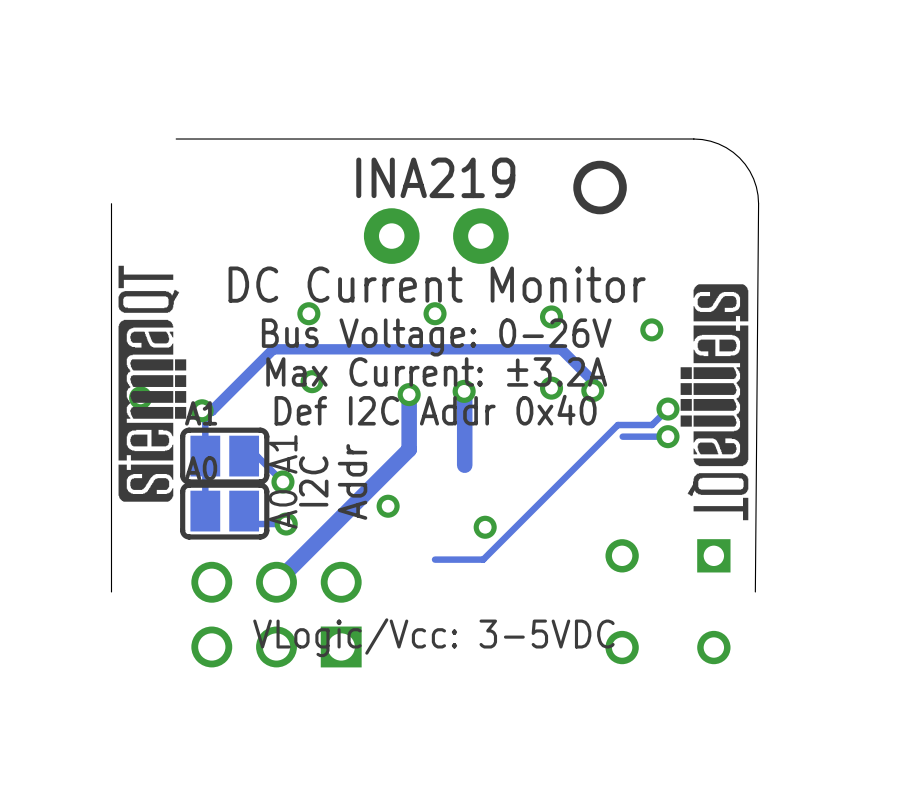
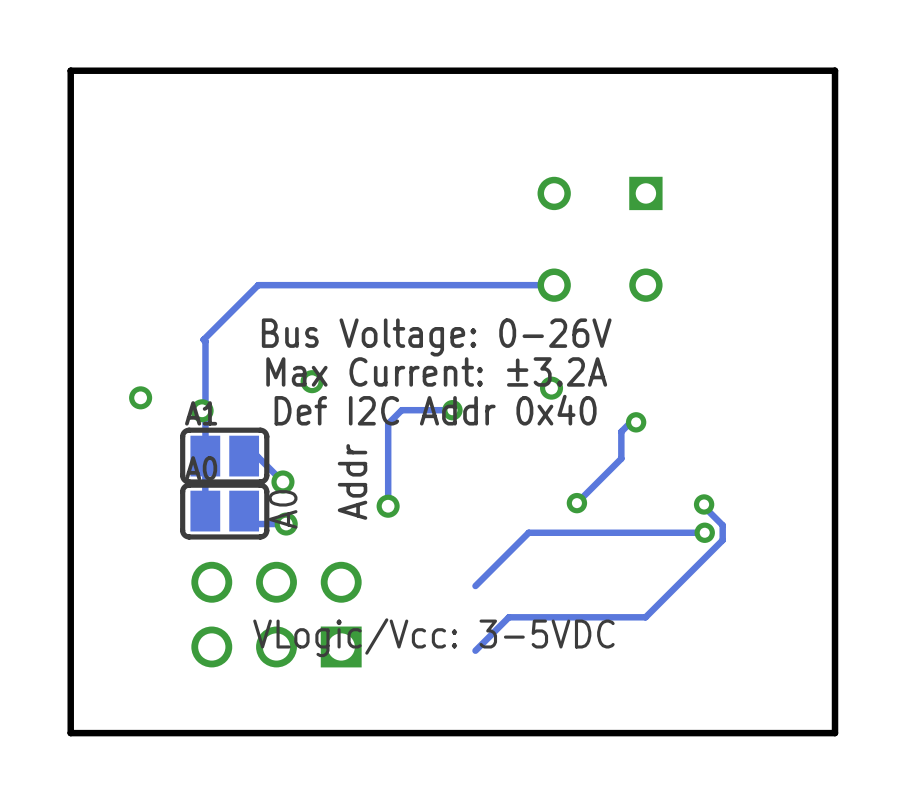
board edge: none -> (835, 70) (70, 70) (70, 733) (835, 733) (835, 70)
board edge: (176, 139) (693, 139) (710, 141) (733, 152) (745, 164) (753, 178) (758, 203) (755, 591) -> none
drawing: [573, 160, 627, 215] -> none
text: INA219 (435, 177) -> none
board edge: (111, 203) (111, 591) -> none
part: (436, 236) -> none
drawing: [118, 265, 187, 502] -> none
text: DC Current Monitor (437, 284) -> none
drawing: [680, 284, 749, 521] -> none
via: (308, 313) -> none
via: (435, 313) -> none
via: (551, 316) -> none
via: (651, 329) -> none
track: (592, 390) (592, 380) (561, 349) (273, 349) (211, 410) (202, 410) (205, 414) (205, 456) -> (554, 285) (258, 285) (203, 339) (205, 341) (205, 455)
via: (592, 390) -> none
track: (464, 391) (464, 465) -> none
via position: (464, 391) -> (452, 410)
track: (409, 394) (409, 449) (273, 585) -> none
via: (409, 394) -> none
track: (667, 409) (652, 425) (617, 425) (483, 559) (435, 559) -> none
via: (667, 409) -> none
track: none -> (452, 410) (401, 410) (388, 423) (388, 506)
track: none -> (636, 422) (630, 422) (621, 431) (621, 458) (576, 503)
via: none -> (636, 422)
track: (667, 436) (622, 436) -> none
via: (667, 436) -> none
text: A1 (282, 454) -> none
text: I2C (313, 481) -> none
via: none -> (576, 503)
track: none -> (704, 504) (722, 525) (722, 540) (645, 617) (508, 617) (475, 650)
via: none -> (704, 504)
via: (485, 527) -> none
track: none -> (704, 532) (528, 532) (475, 586)
via: none -> (704, 532)
part position: (667, 601) -> (600, 239)

